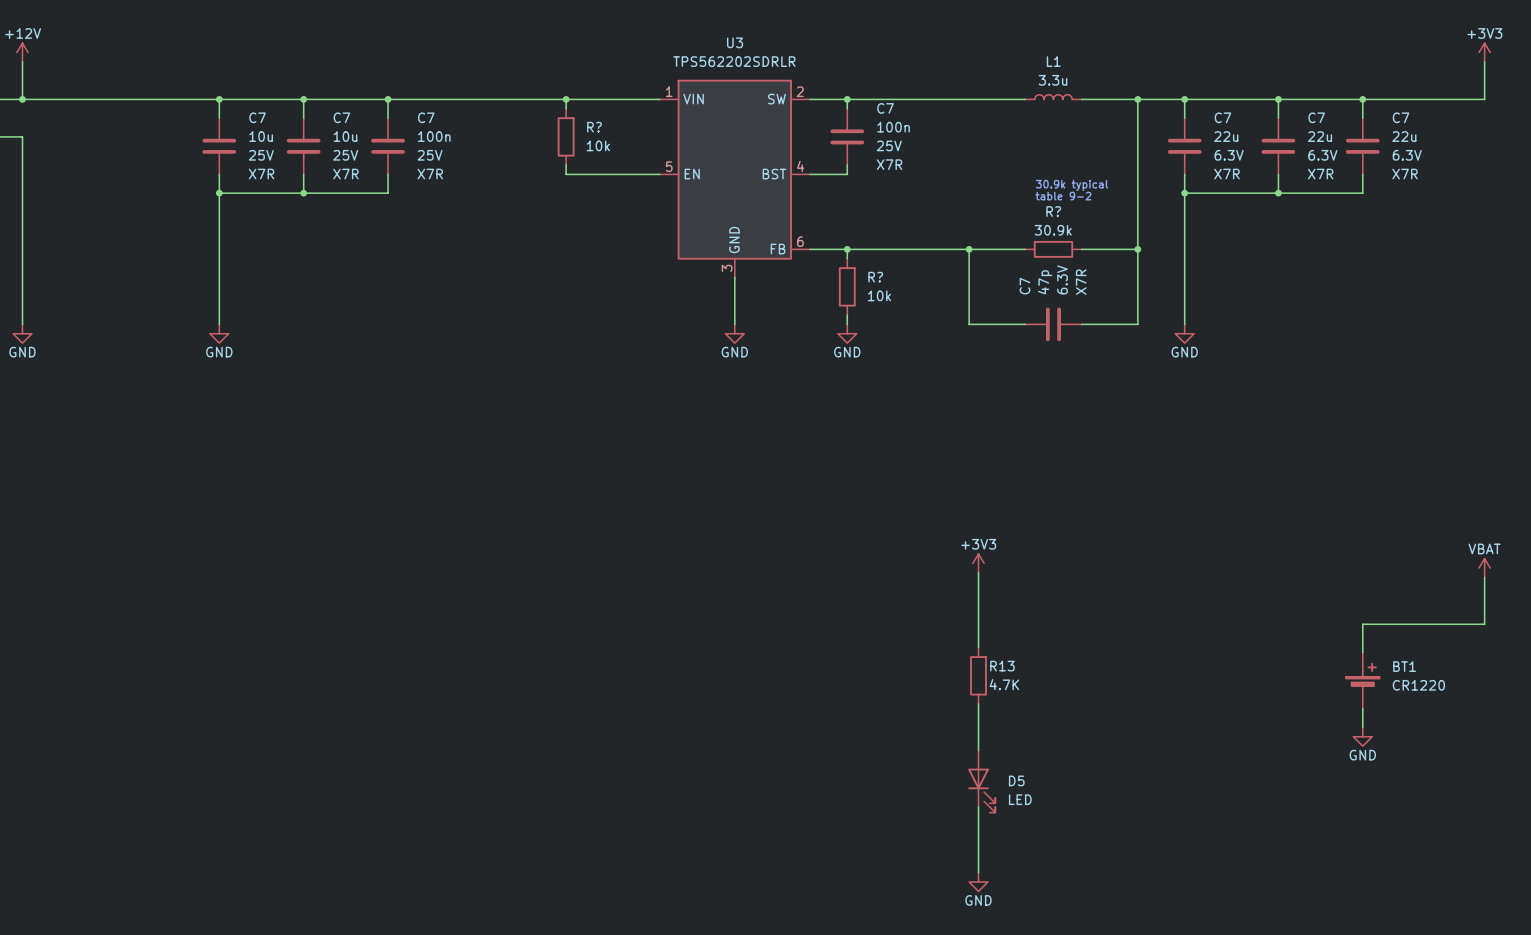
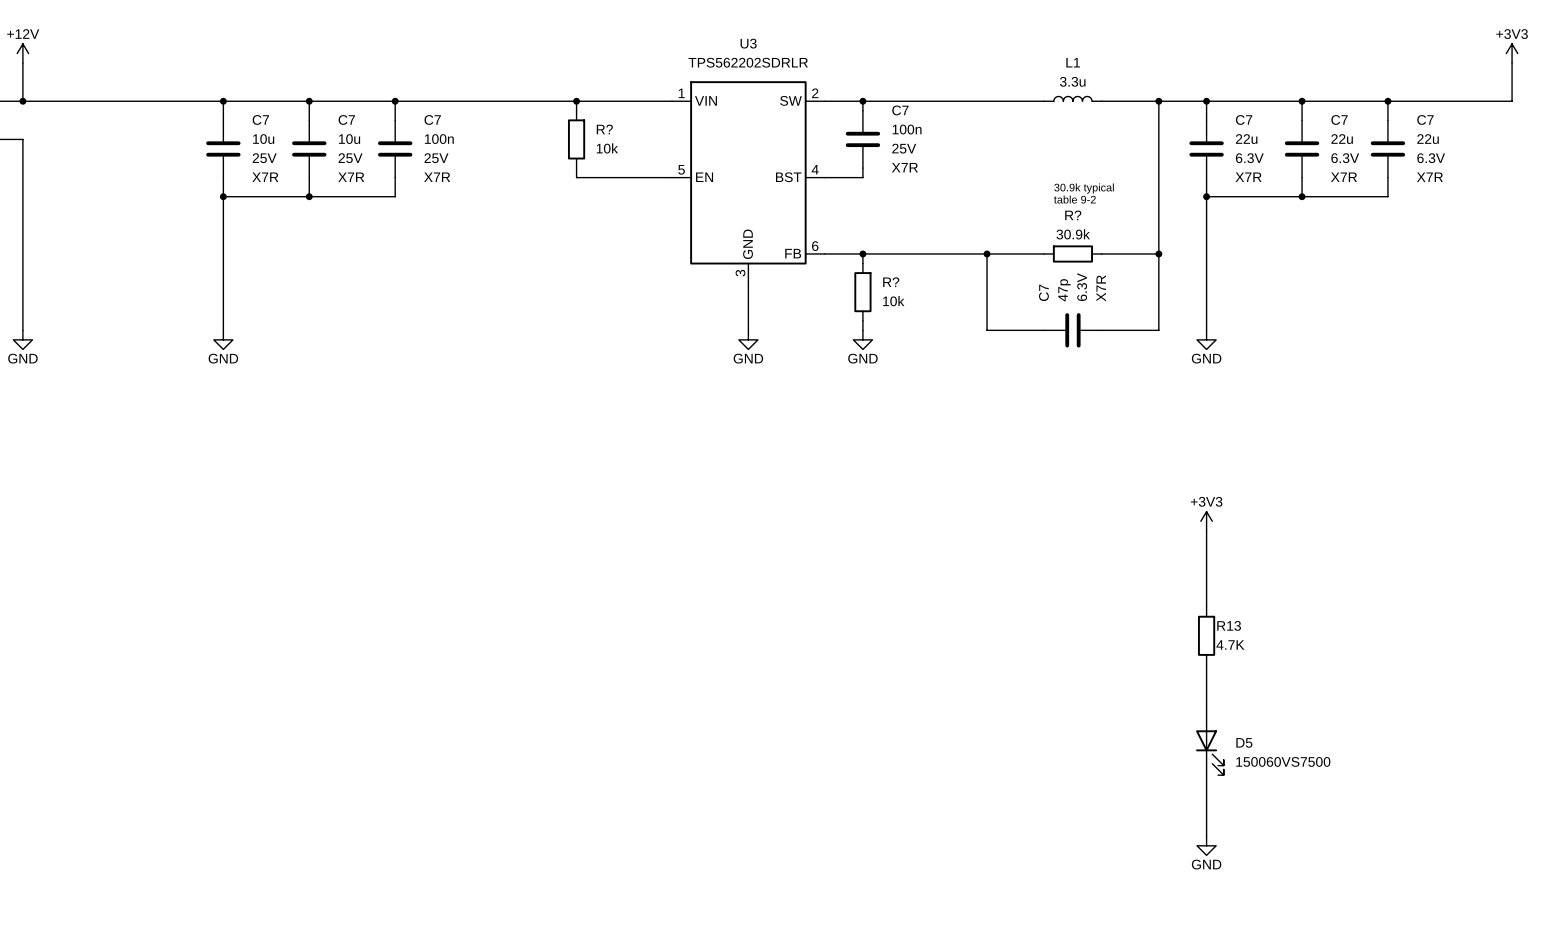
power symbol: none -> +3V3 (1206, 521)
wire: none -> (1206, 530) (1206, 607)
power symbol: +3V3 (978, 563) -> none
power symbol: VBAT (1484, 568) -> none
wire: (978, 572) (978, 647) -> none
wire: (1484, 577) (1484, 624) (1362, 624) (1362, 652) -> none
wire: none -> (1206, 664) (1206, 712)
R13 position: (978, 675) -> (1206, 635)
BT1: CR1220 (1362, 680) -> none
wire: (978, 703) (978, 750) -> none
wire: (1362, 708) (1362, 727) -> none
power symbol: GND (1362, 736) -> none
wire: none -> (1206, 769) (1206, 836)
D5 position: (981, 781) -> (1209, 743)
D5 value: LED (1020, 799) -> 150060VS7500 (1283, 761)
wire: (978, 807) (978, 872) -> none
power symbol: none -> GND (1206, 845)
power symbol: GND (978, 882) -> none

